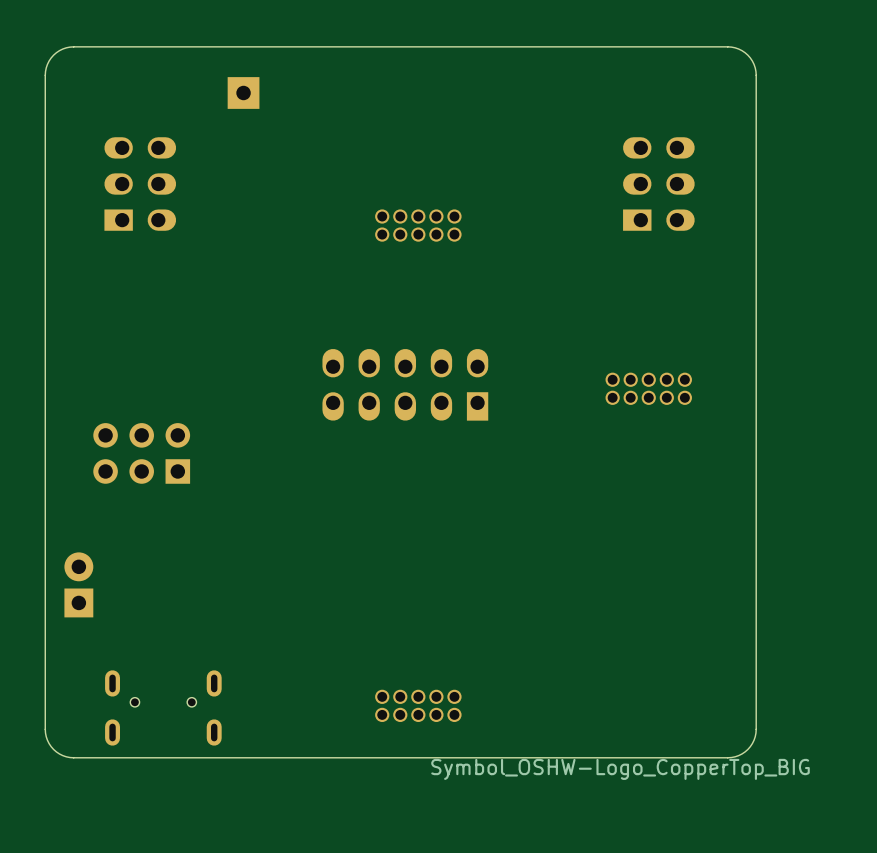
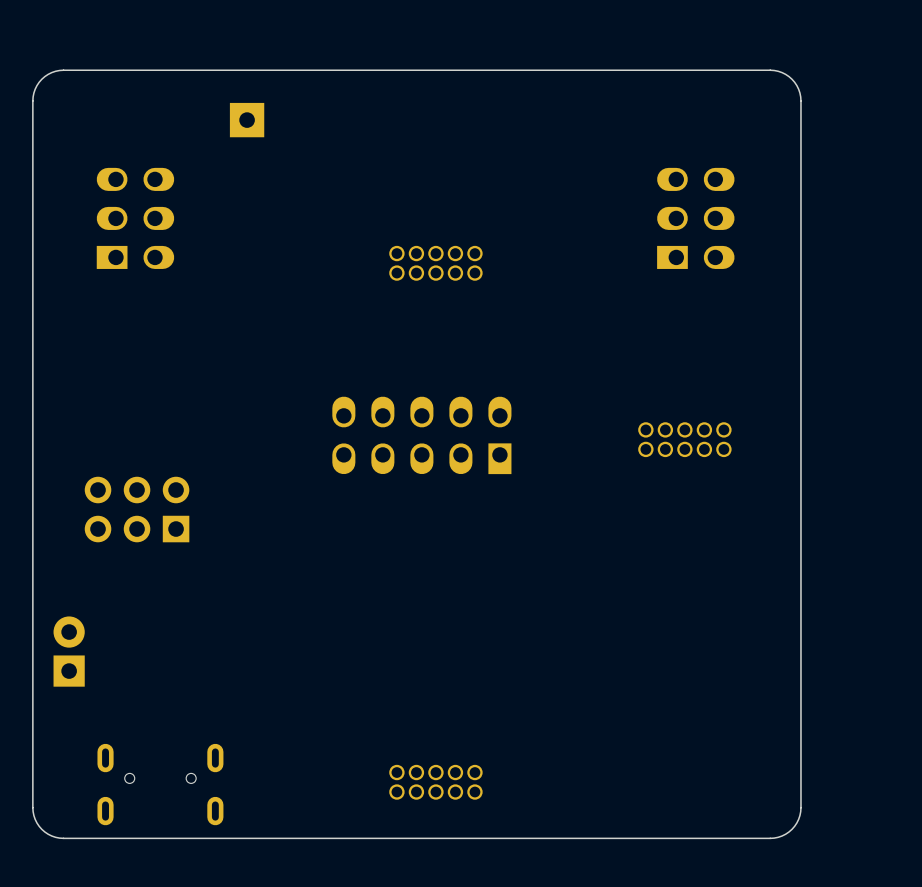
drawing: [431, 758, 810, 780] -> none

